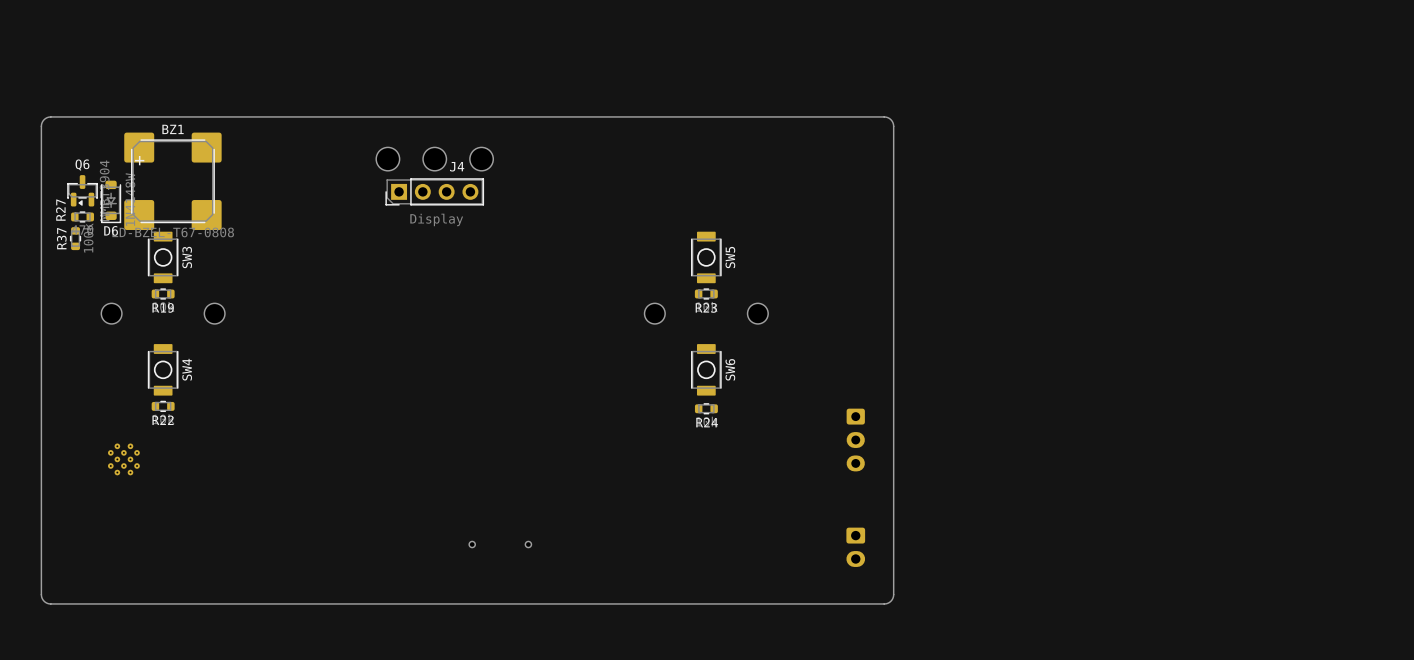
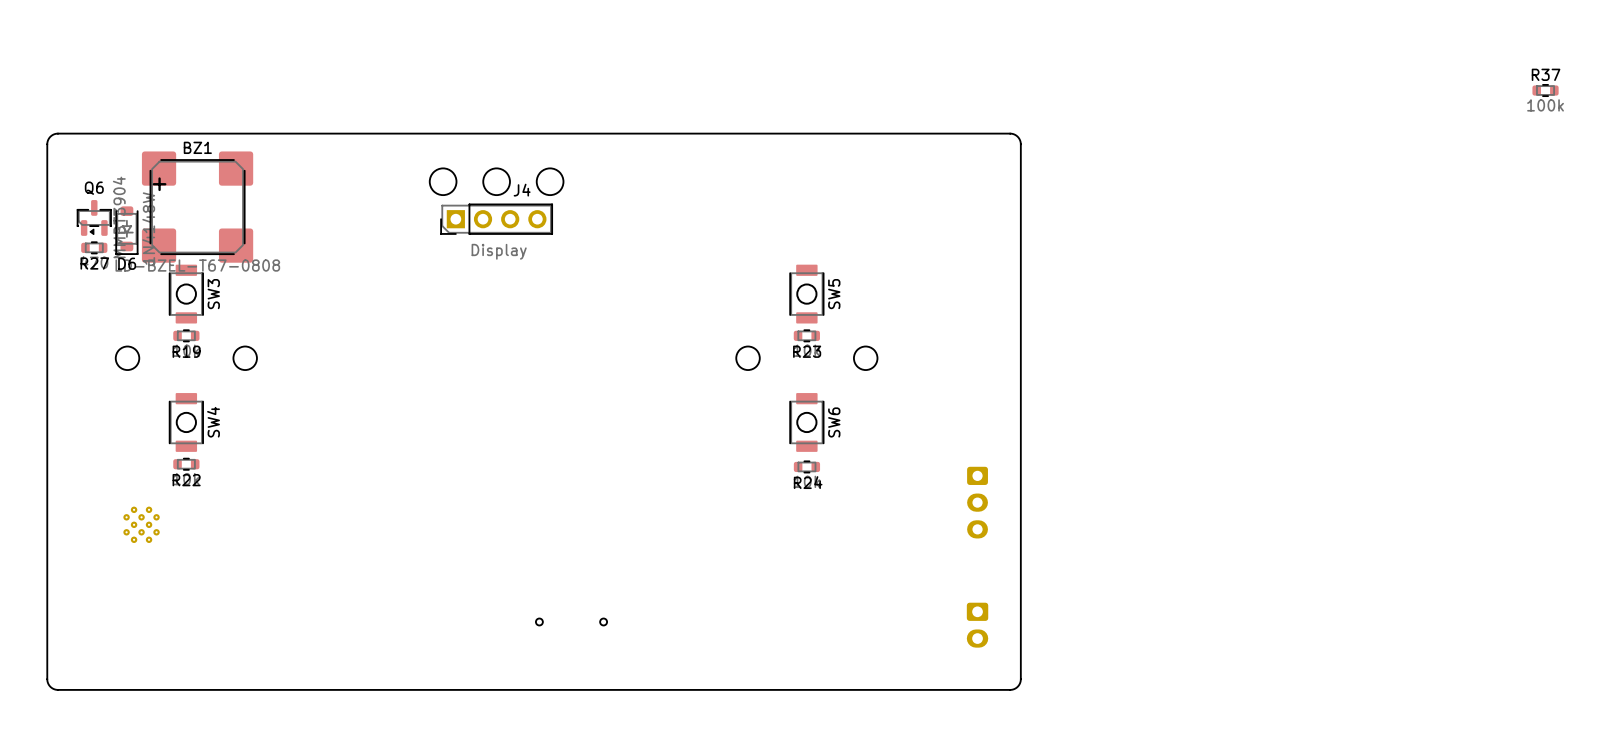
R27 name rotation: 0° (60, 210) -> 90° clockwise (94, 263)
R37 rotation: 0° (75, 238) -> 90° clockwise (1545, 90)
R37 position: (75, 238) -> (1545, 90)

